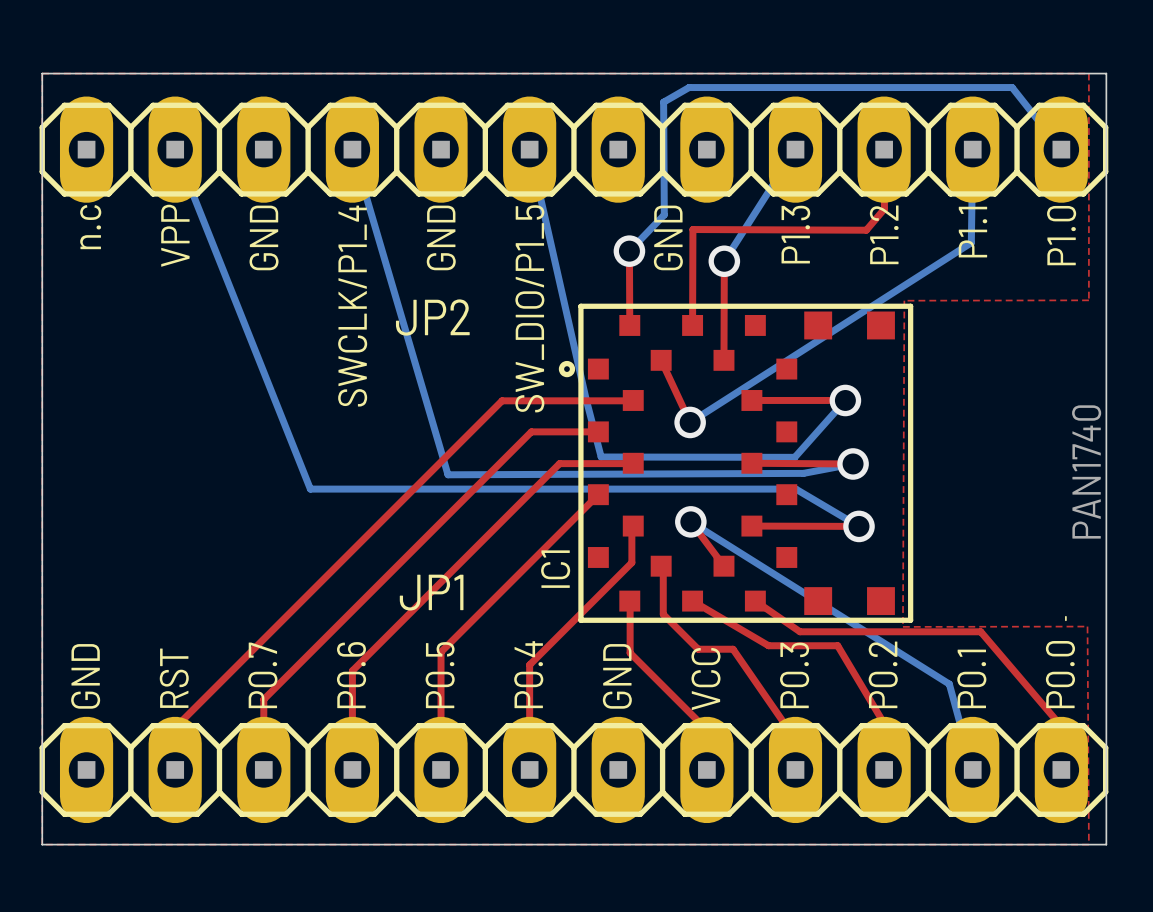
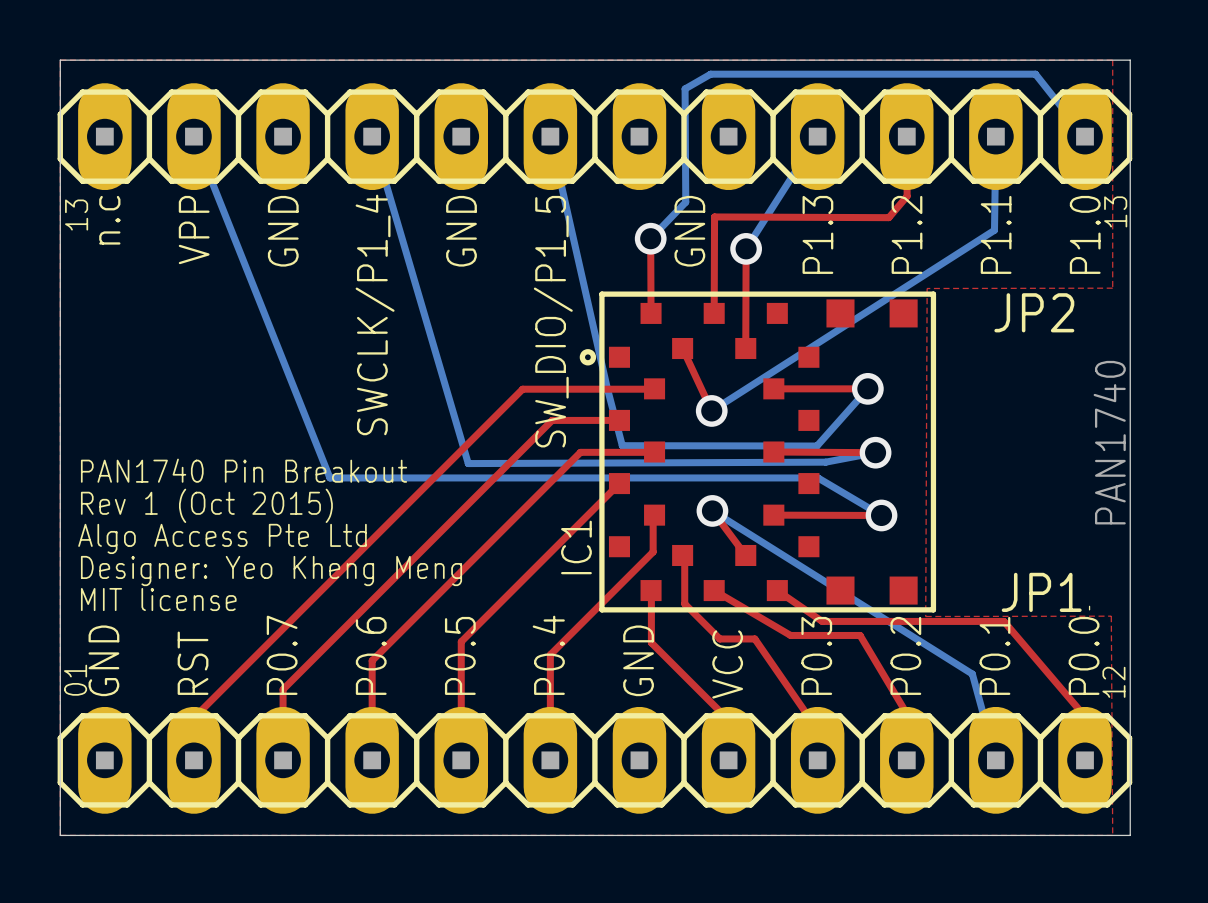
text: none -> 13 (76, 215)
text: none -> 13 (1115, 211)
JP2 name position: JP2 (432, 317) -> JP2 (1034, 312)
text: none -> PAN1740 Pin Breakout (244, 470)
text: none -> Rev 1 (Oct 2015) (206, 505)
text: none -> Algo Access Pte Ltd (222, 538)
text: none -> Designer: Yeo Kheng Meng (271, 571)
JP1 name position: JP1 (431, 592) -> JP1 (1041, 592)
text: none -> MIT license (158, 599)
text: none -> 01 (75, 680)
text: none -> 12 (1113, 682)

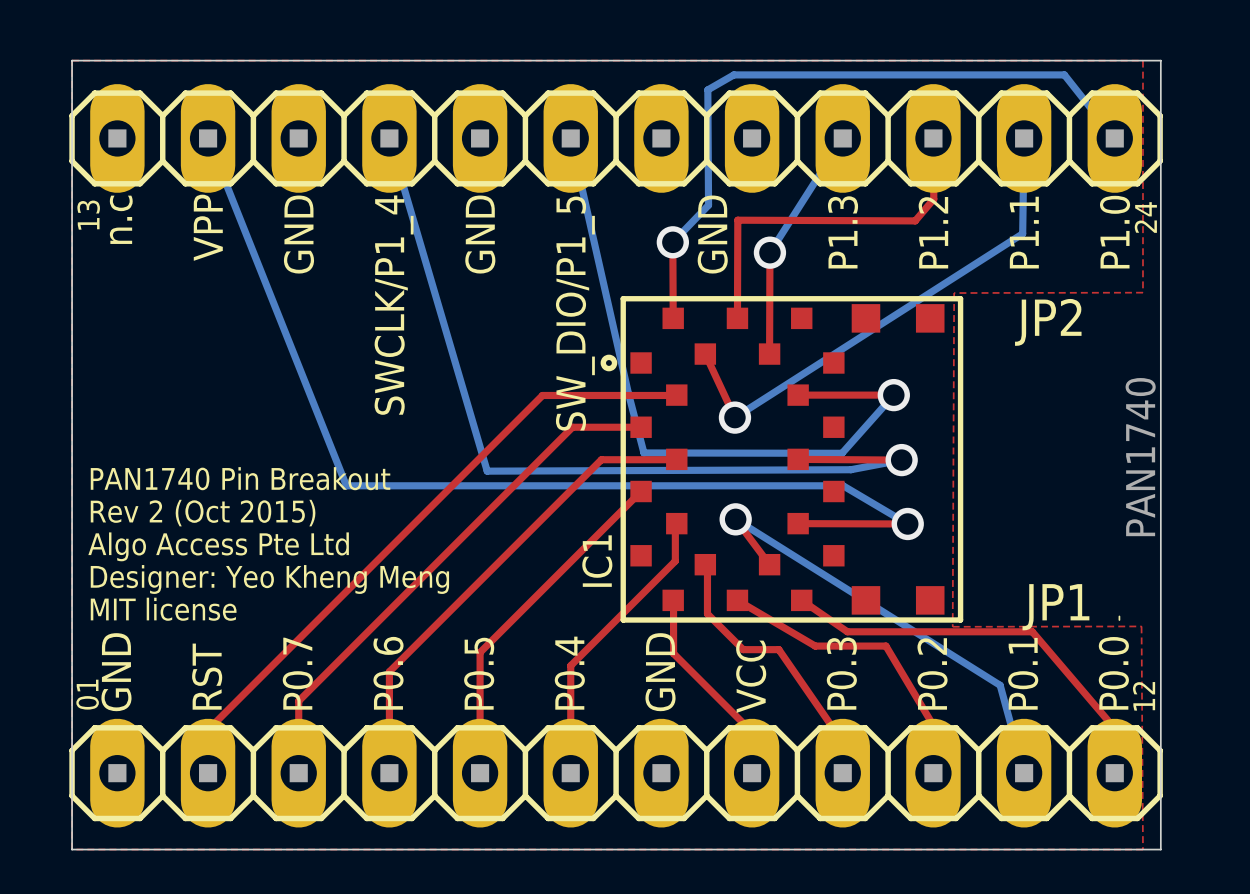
text: 13 (1115, 211) -> 24 (1145, 217)
text: Rev 1 (Oct 2015) (206, 505) -> Rev 2 (Oct 2015) (203, 513)

